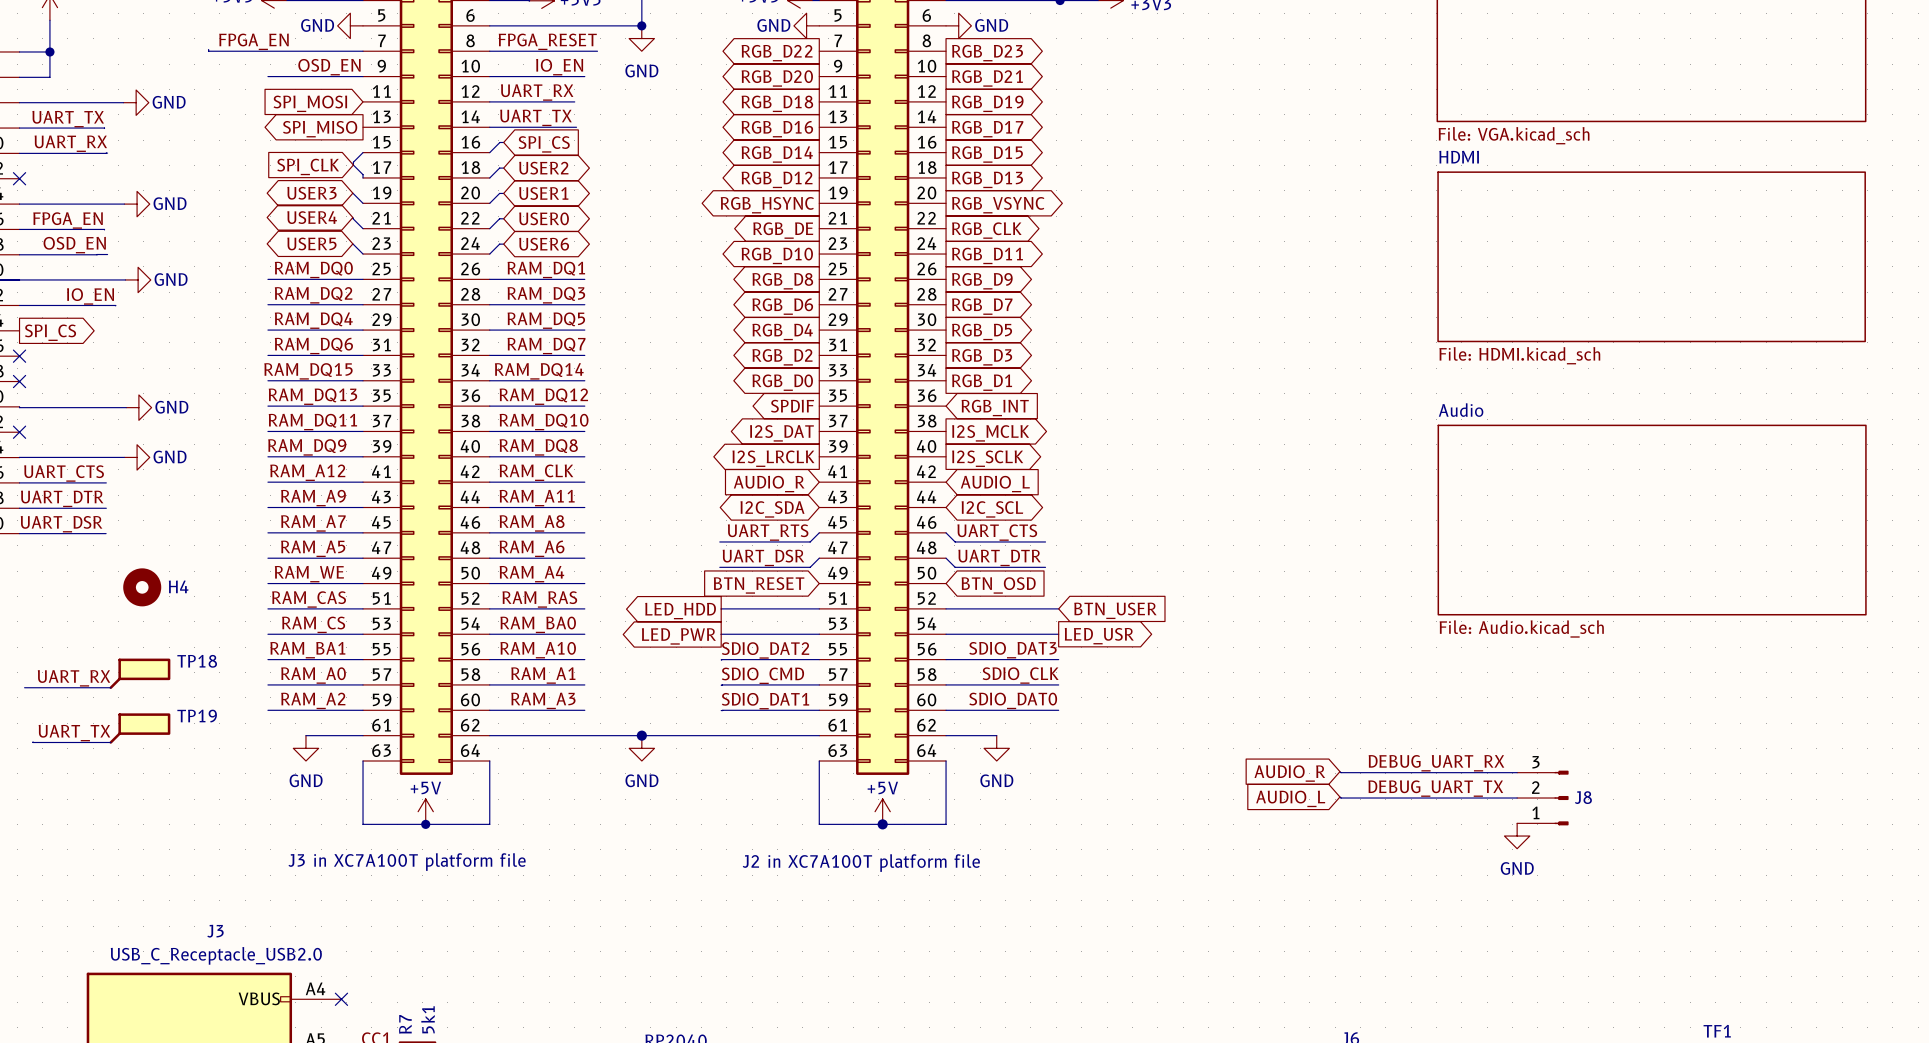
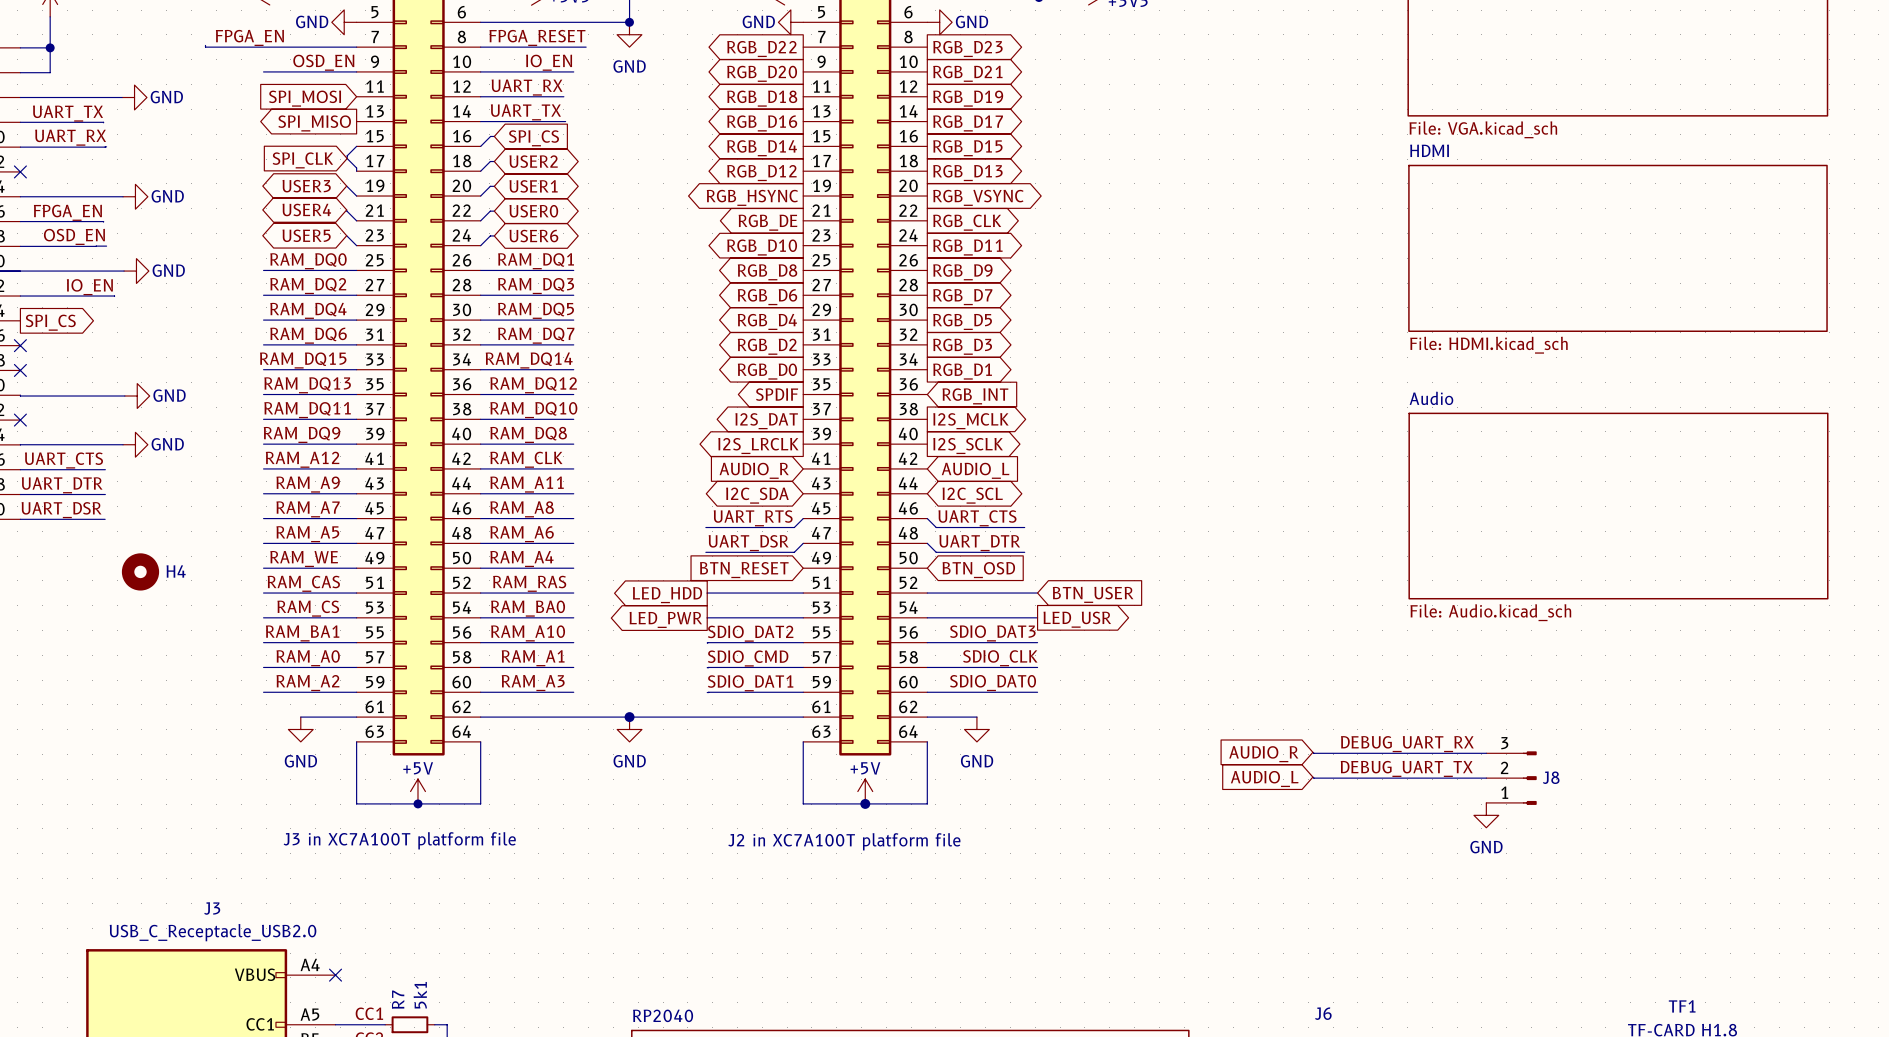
TP18: (139, 673) -> none
label: UART_RX (74, 678) -> none
wire: (24, 687) (110, 687) -> none
TP19: (139, 728) -> none
label: UART_TX (74, 733) -> none
wire: (32, 741) (110, 742) -> none

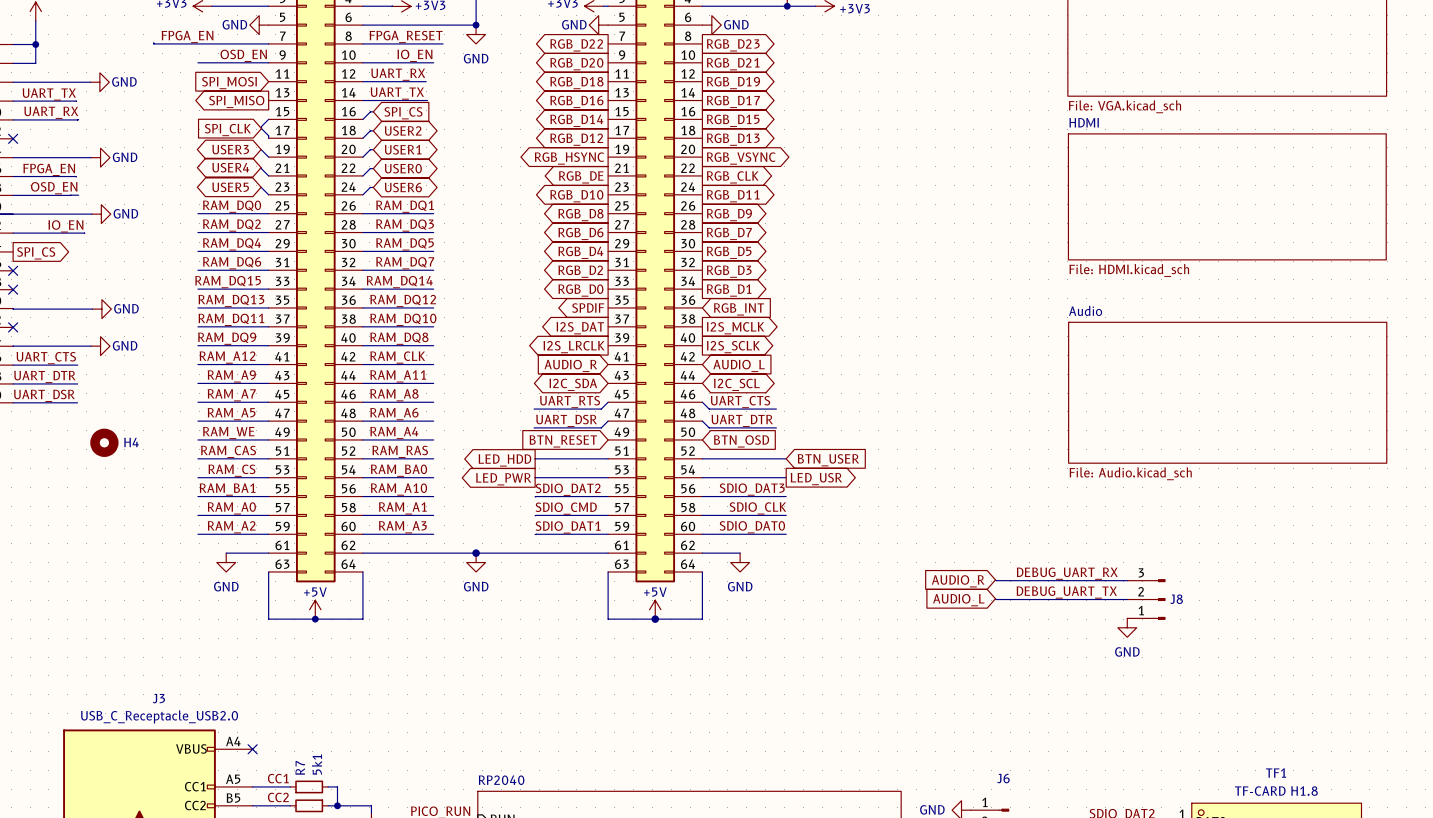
text: J3 in XC7A100T platform file (399, 840) -> none
text: J2 in XC7A100T platform file (844, 841) -> none

